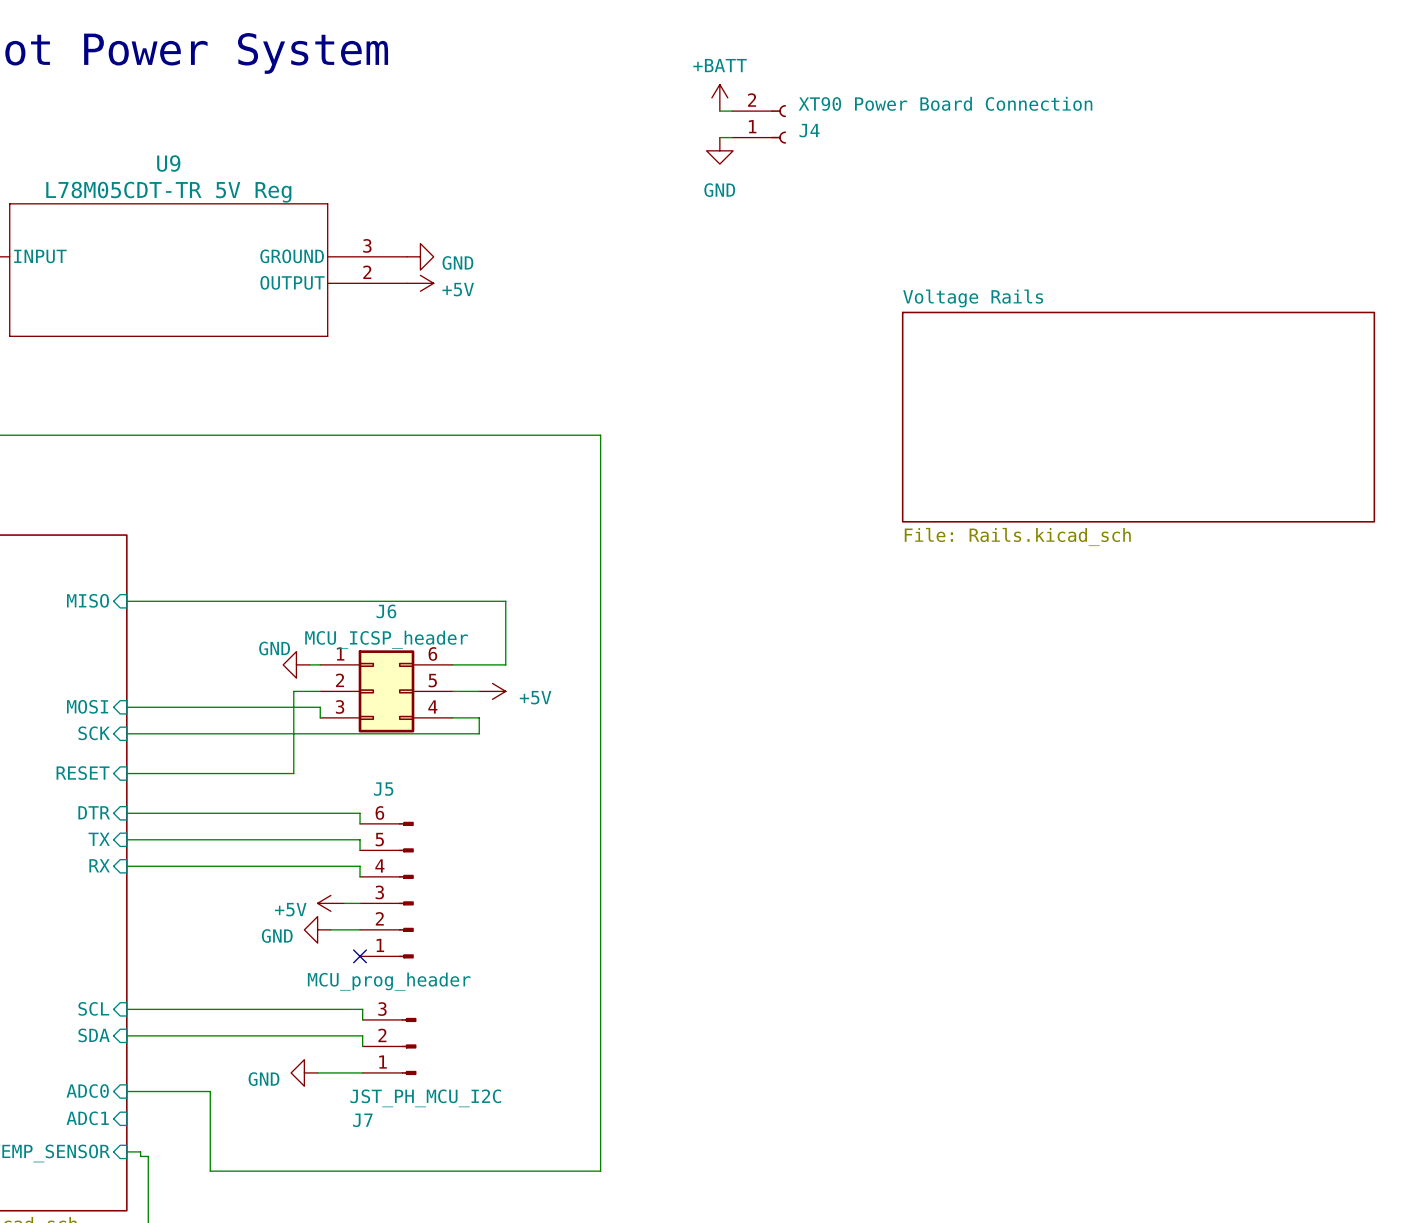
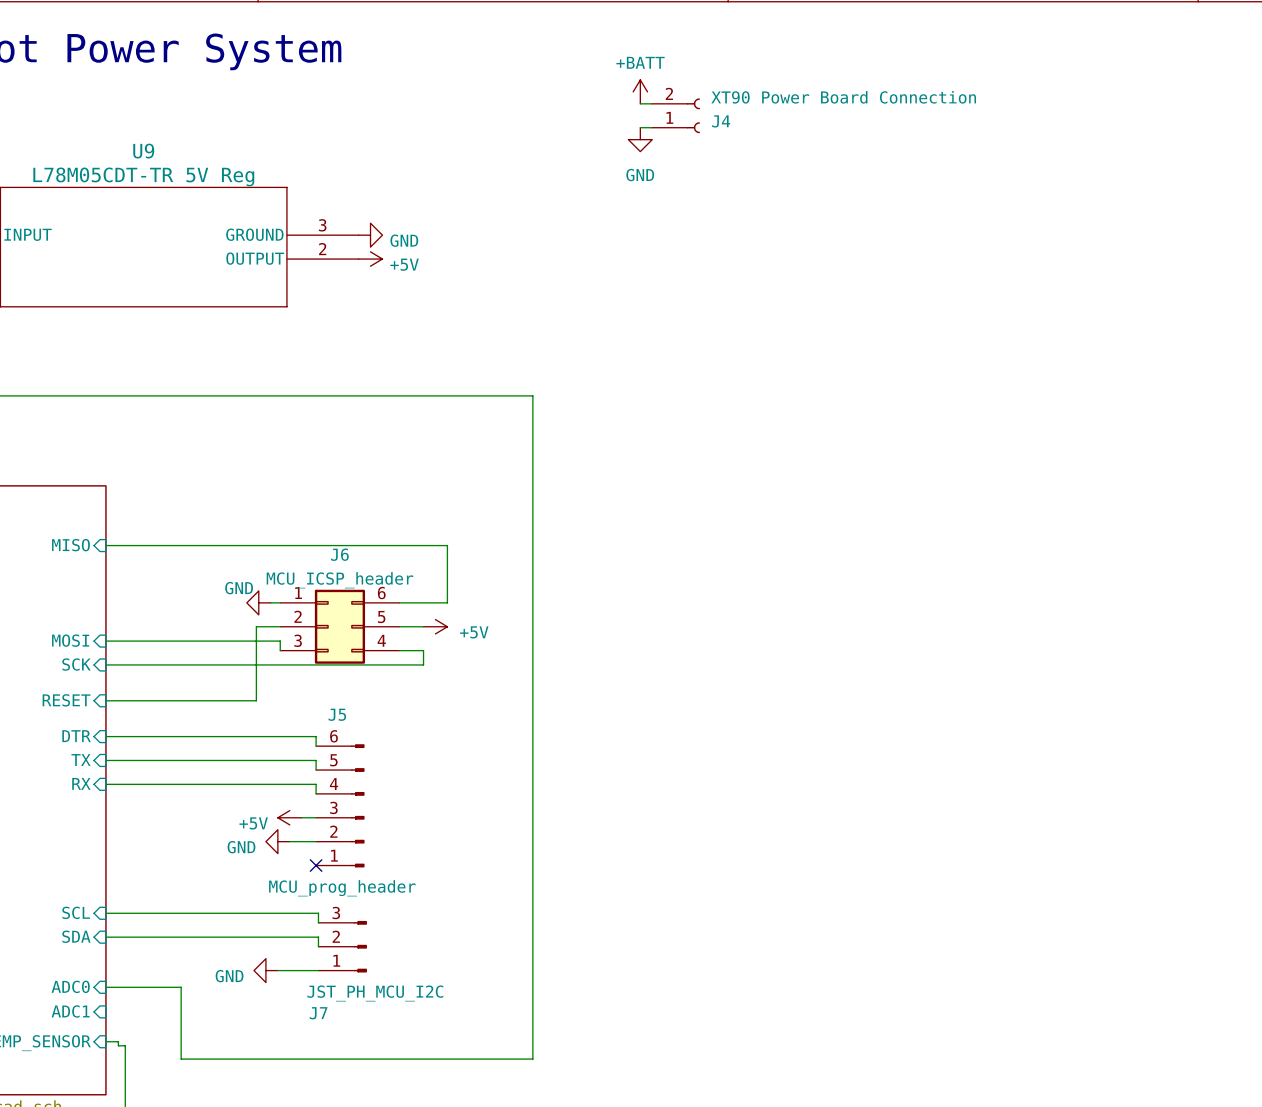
sheet Voltage Rails: File: Rails.kicad_sch (1138, 417) -> none

